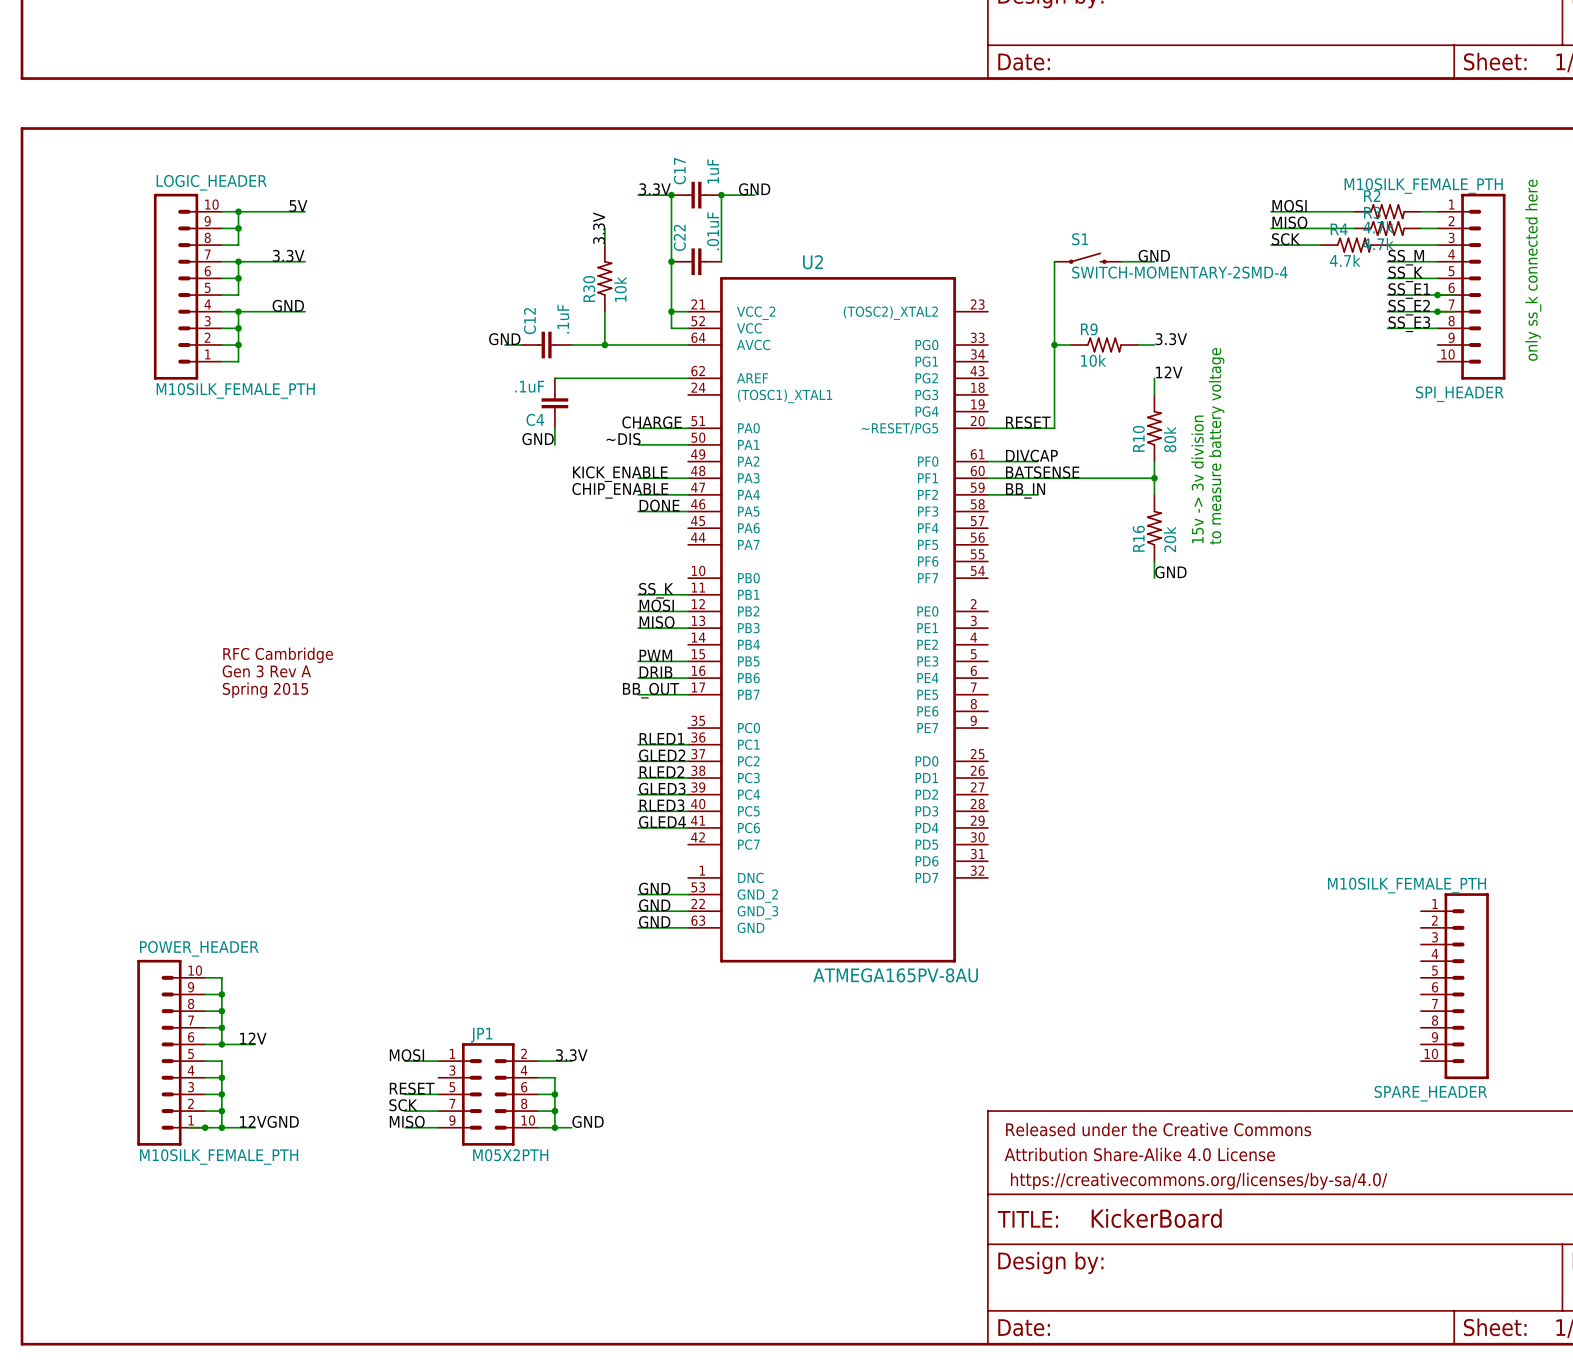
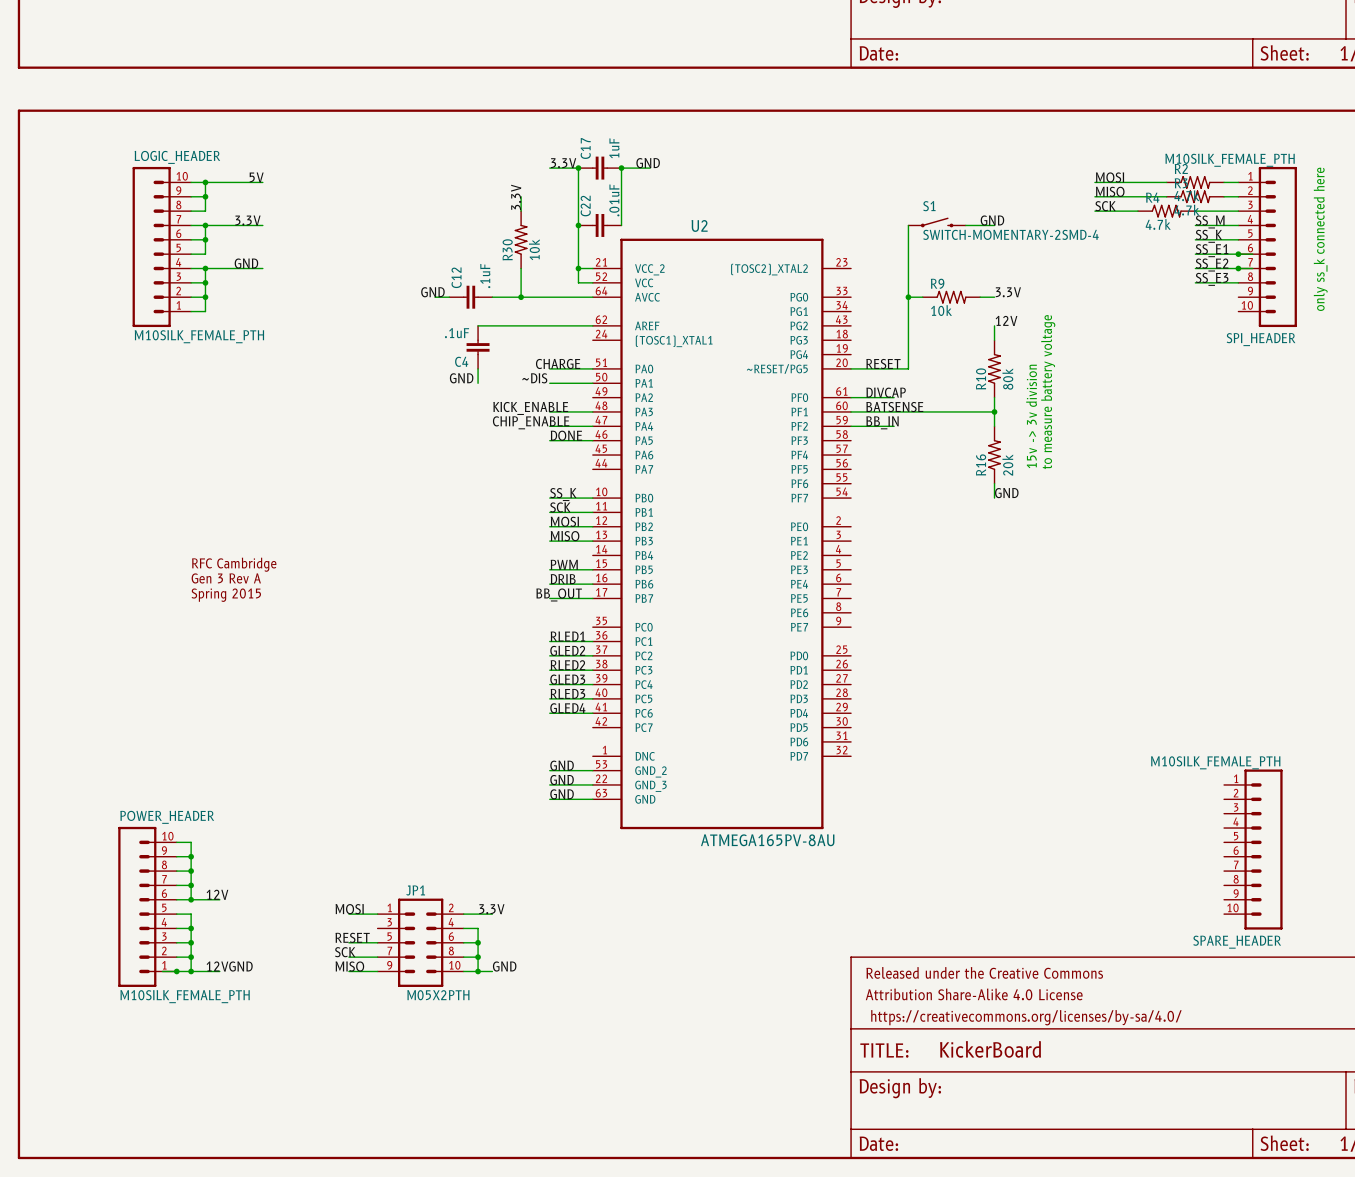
label: none -> SS_K (563, 494)
wire: none -> (549, 498) (592, 498)
label: SS_K (656, 590) -> SCK (560, 507)

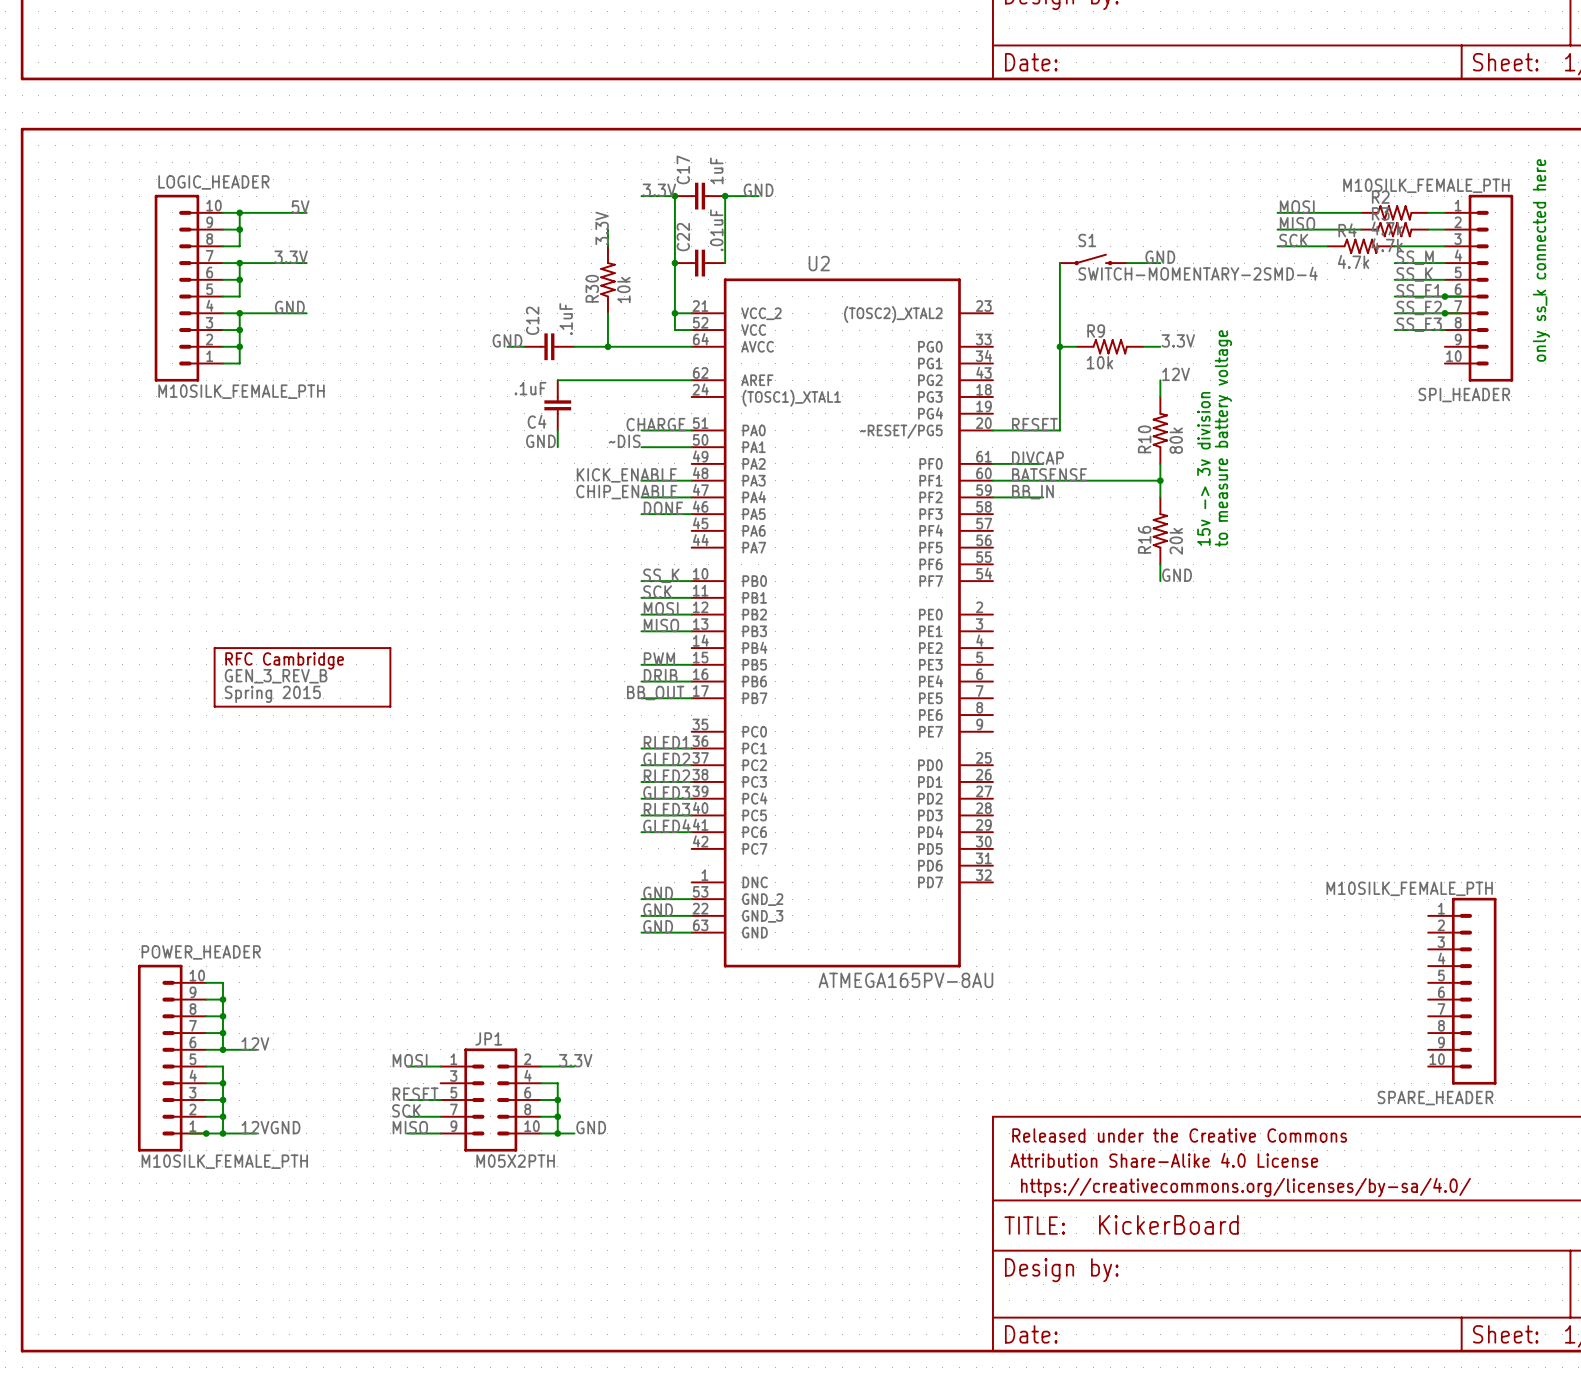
part: (233, 579) -> none
GEN_3_REV_B: none -> Spring 2015 (302, 677)

